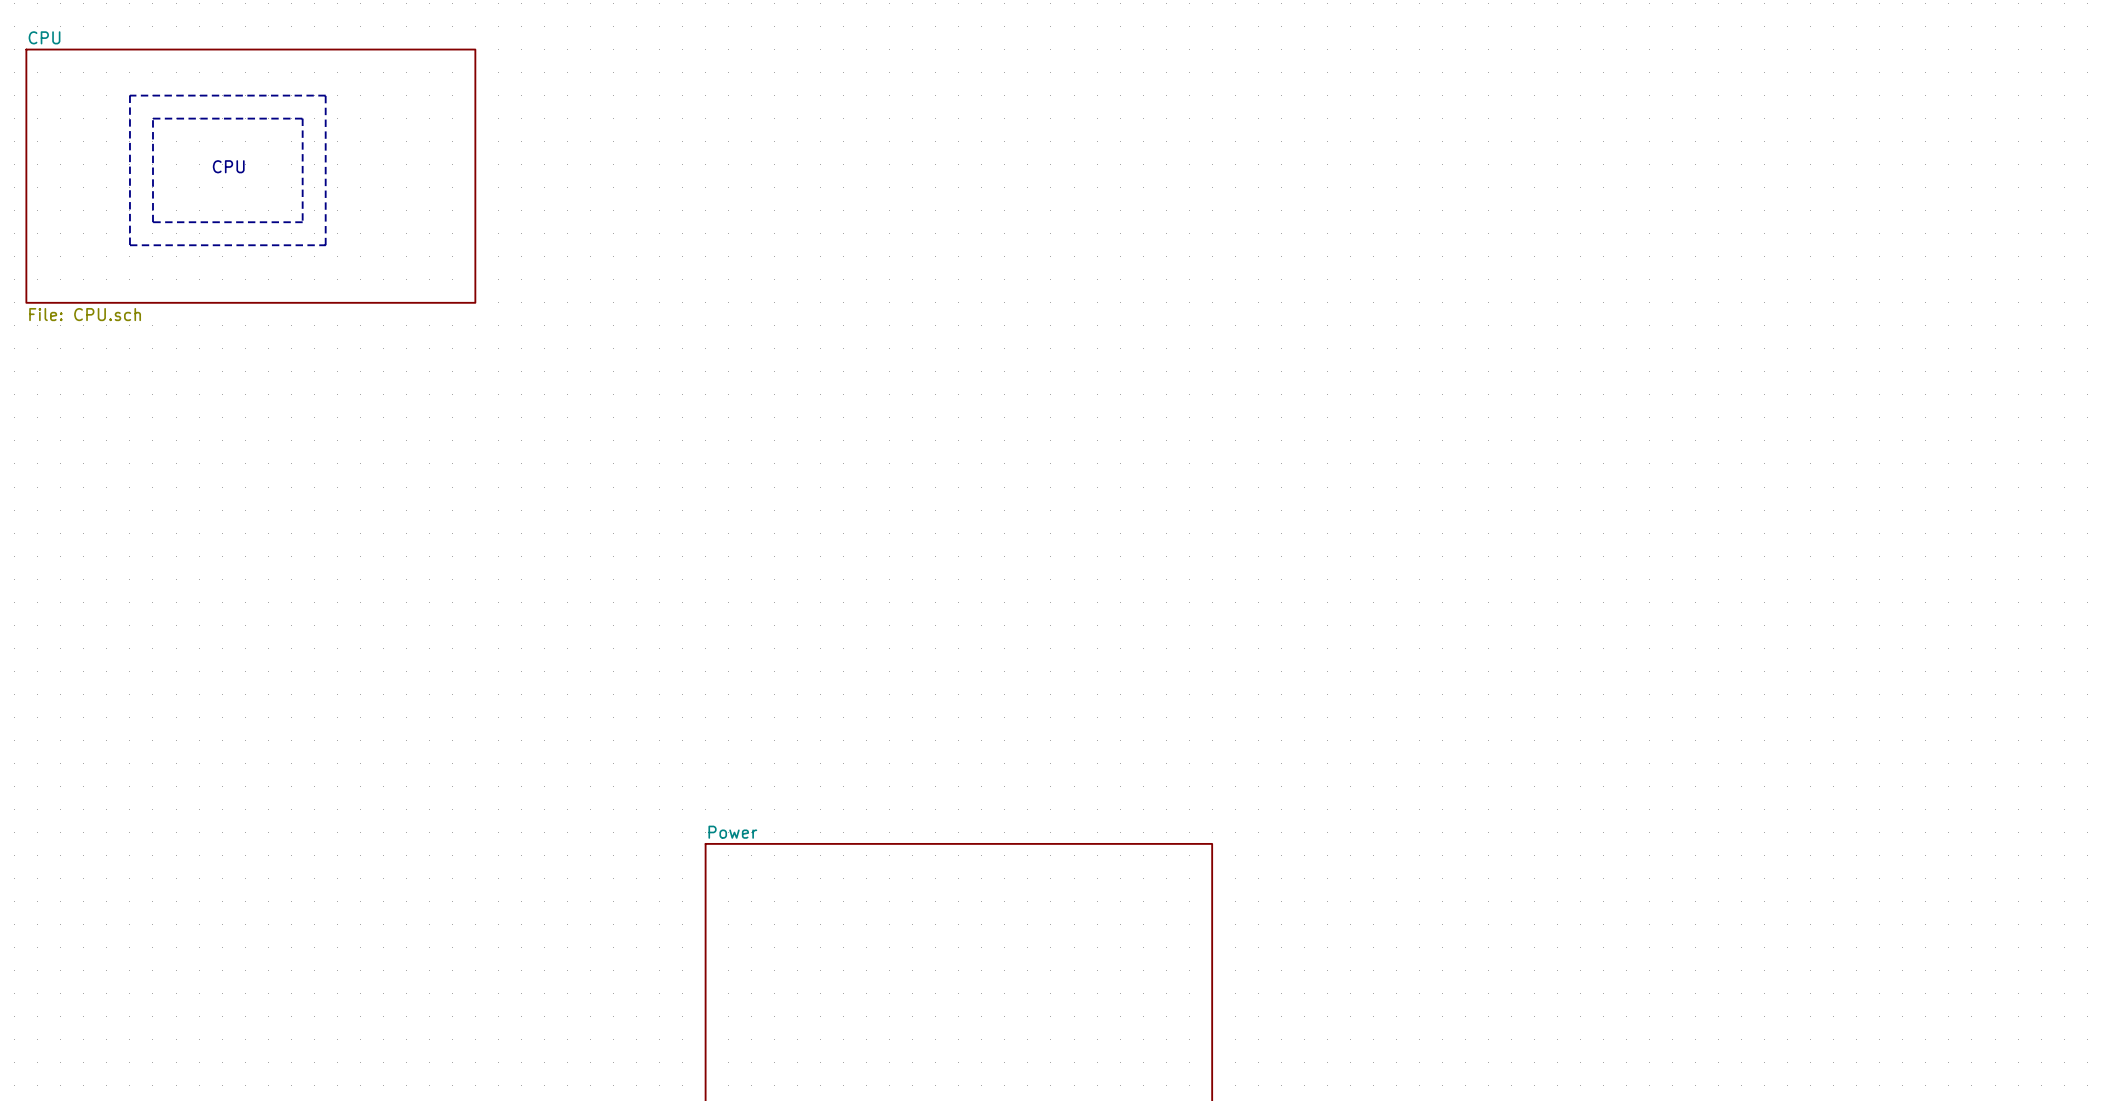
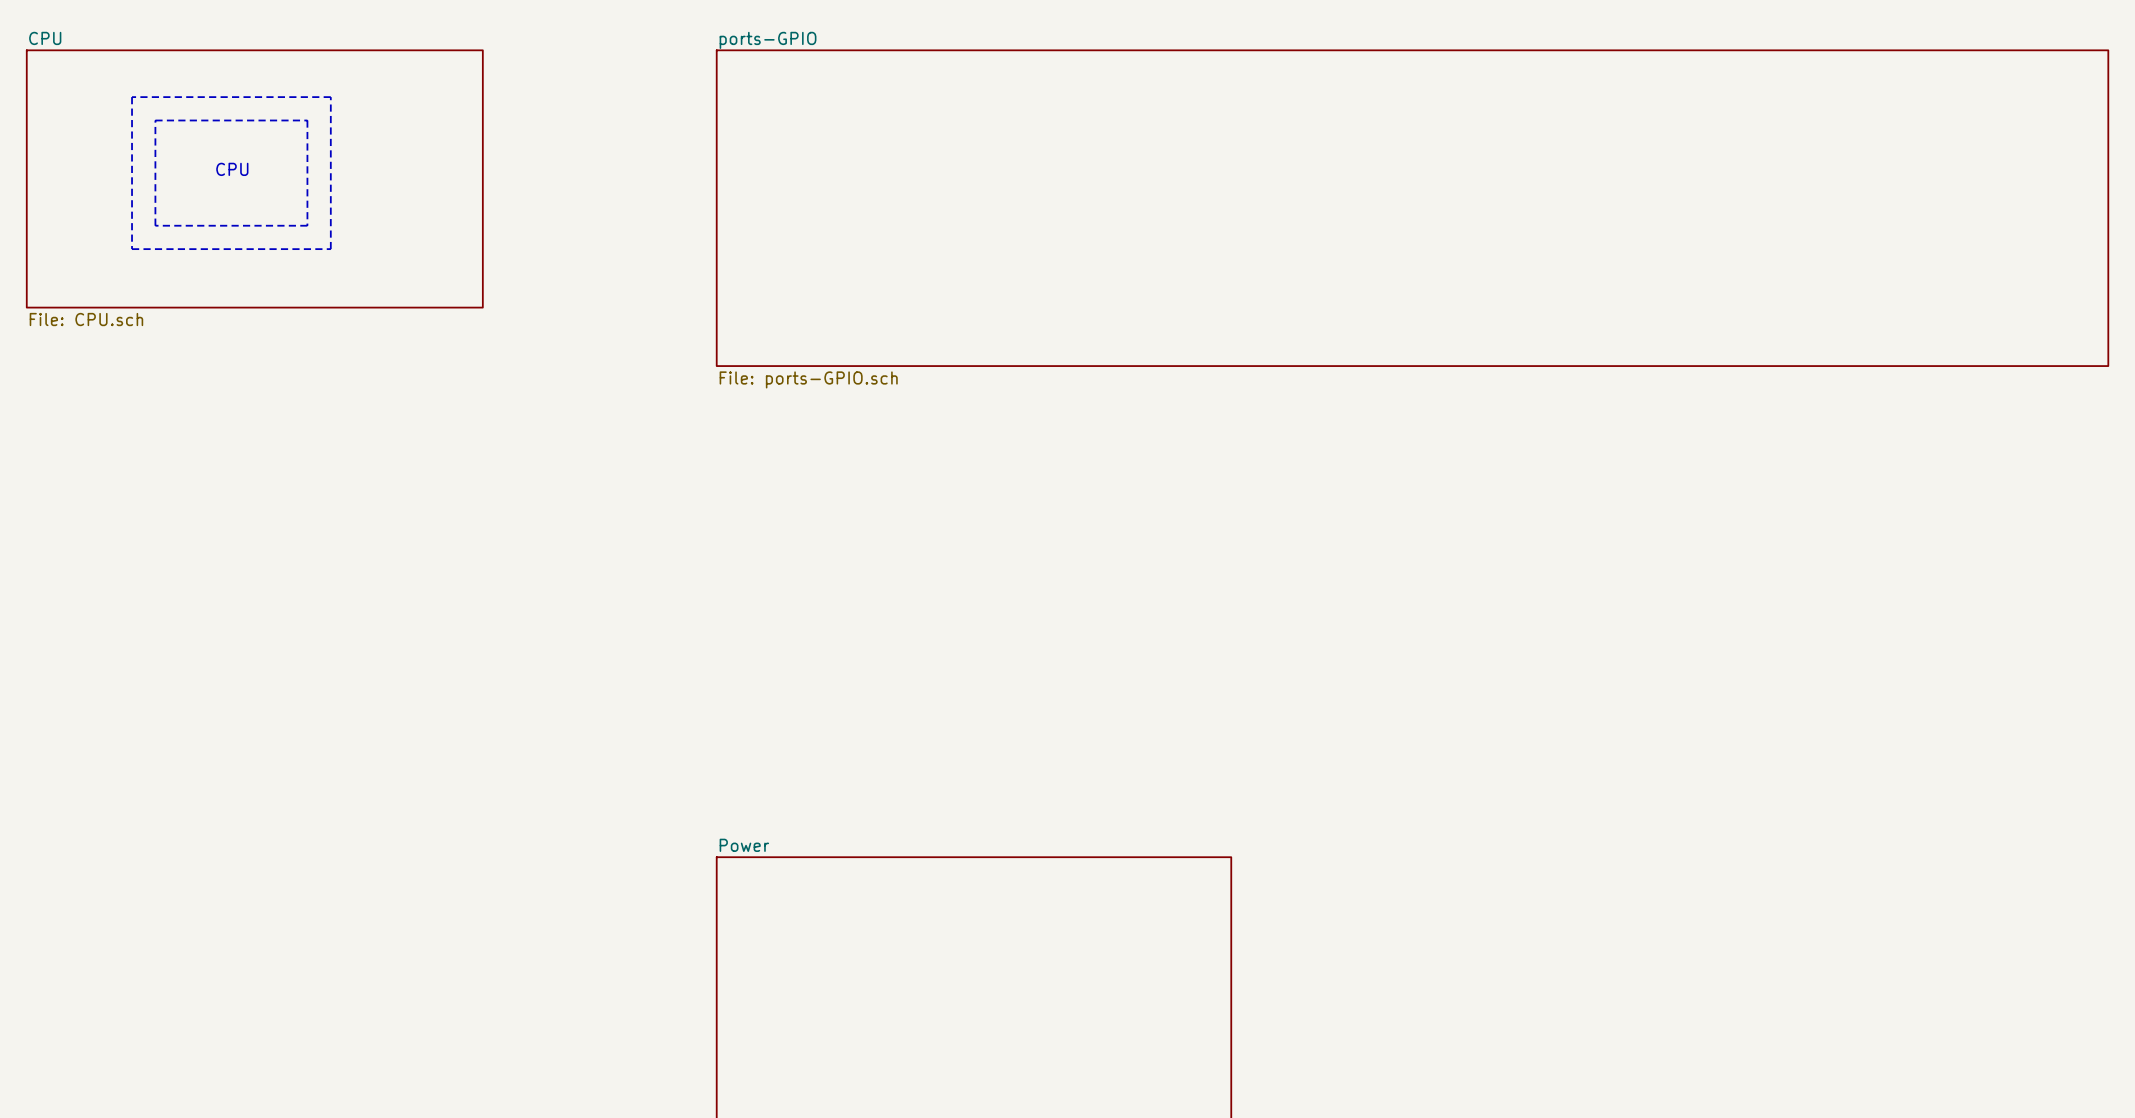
sheet ports-GPIO: none -> File: ports-GPIO.sch (1412, 208)

